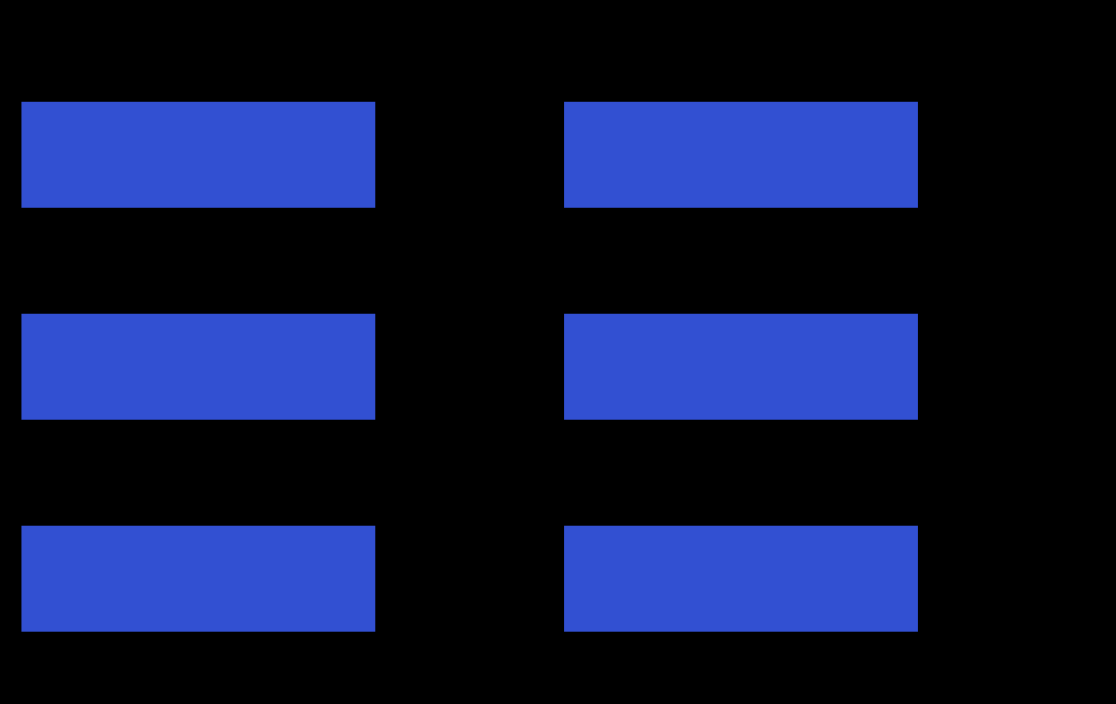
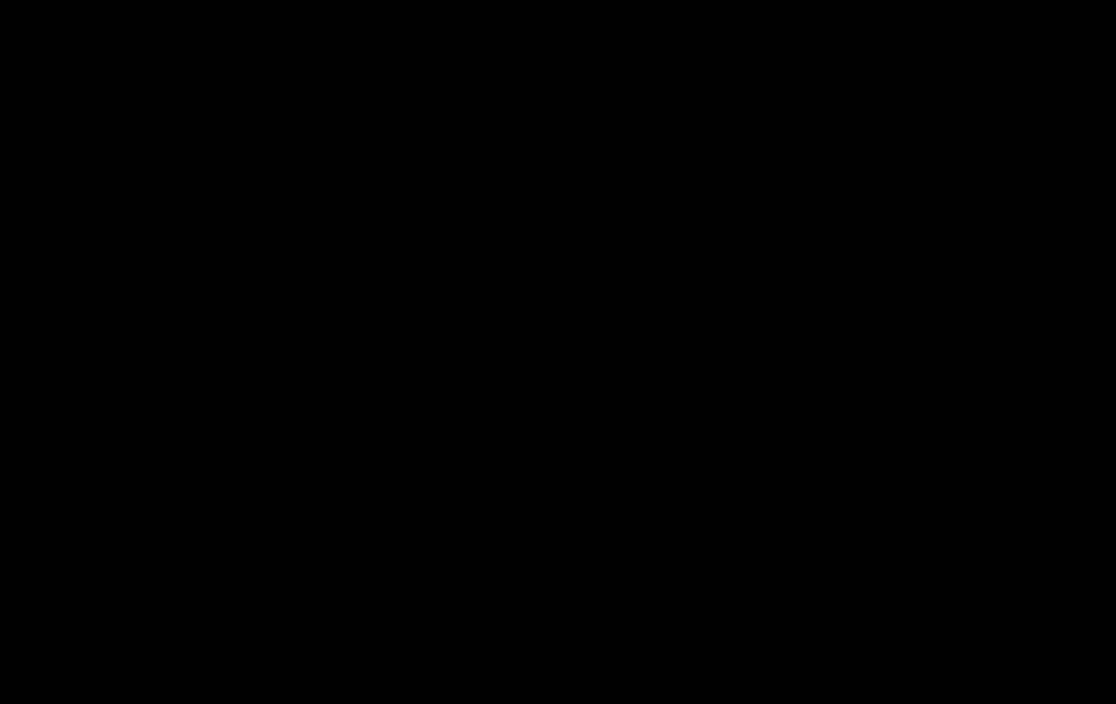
part: (469, 366) -> none

